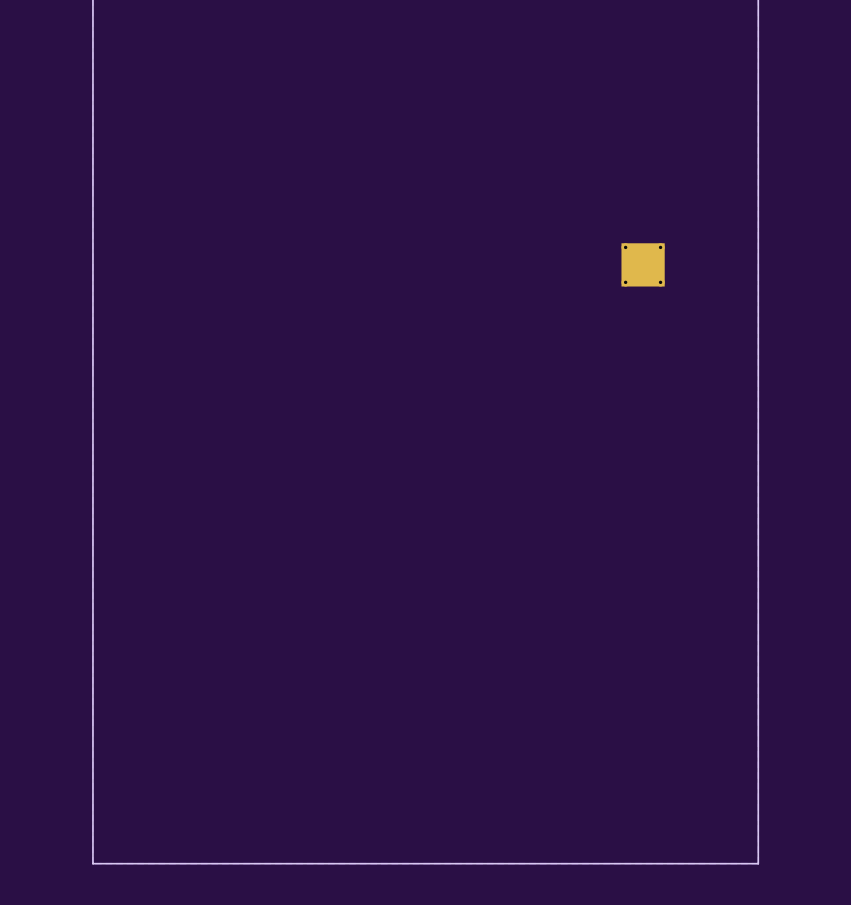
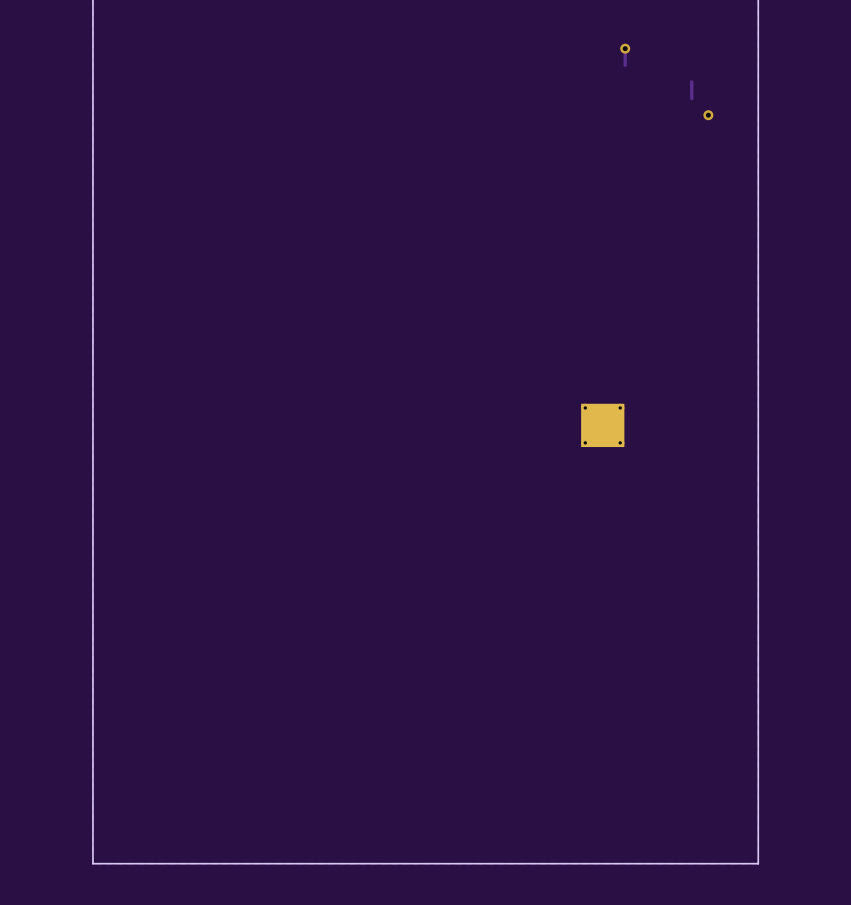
track: none -> (625, 48) (625, 65)
via: none -> (625, 48)
track: none -> (691, 81) (691, 98)
via: none -> (708, 115)
part position: (643, 264) -> (602, 425)

